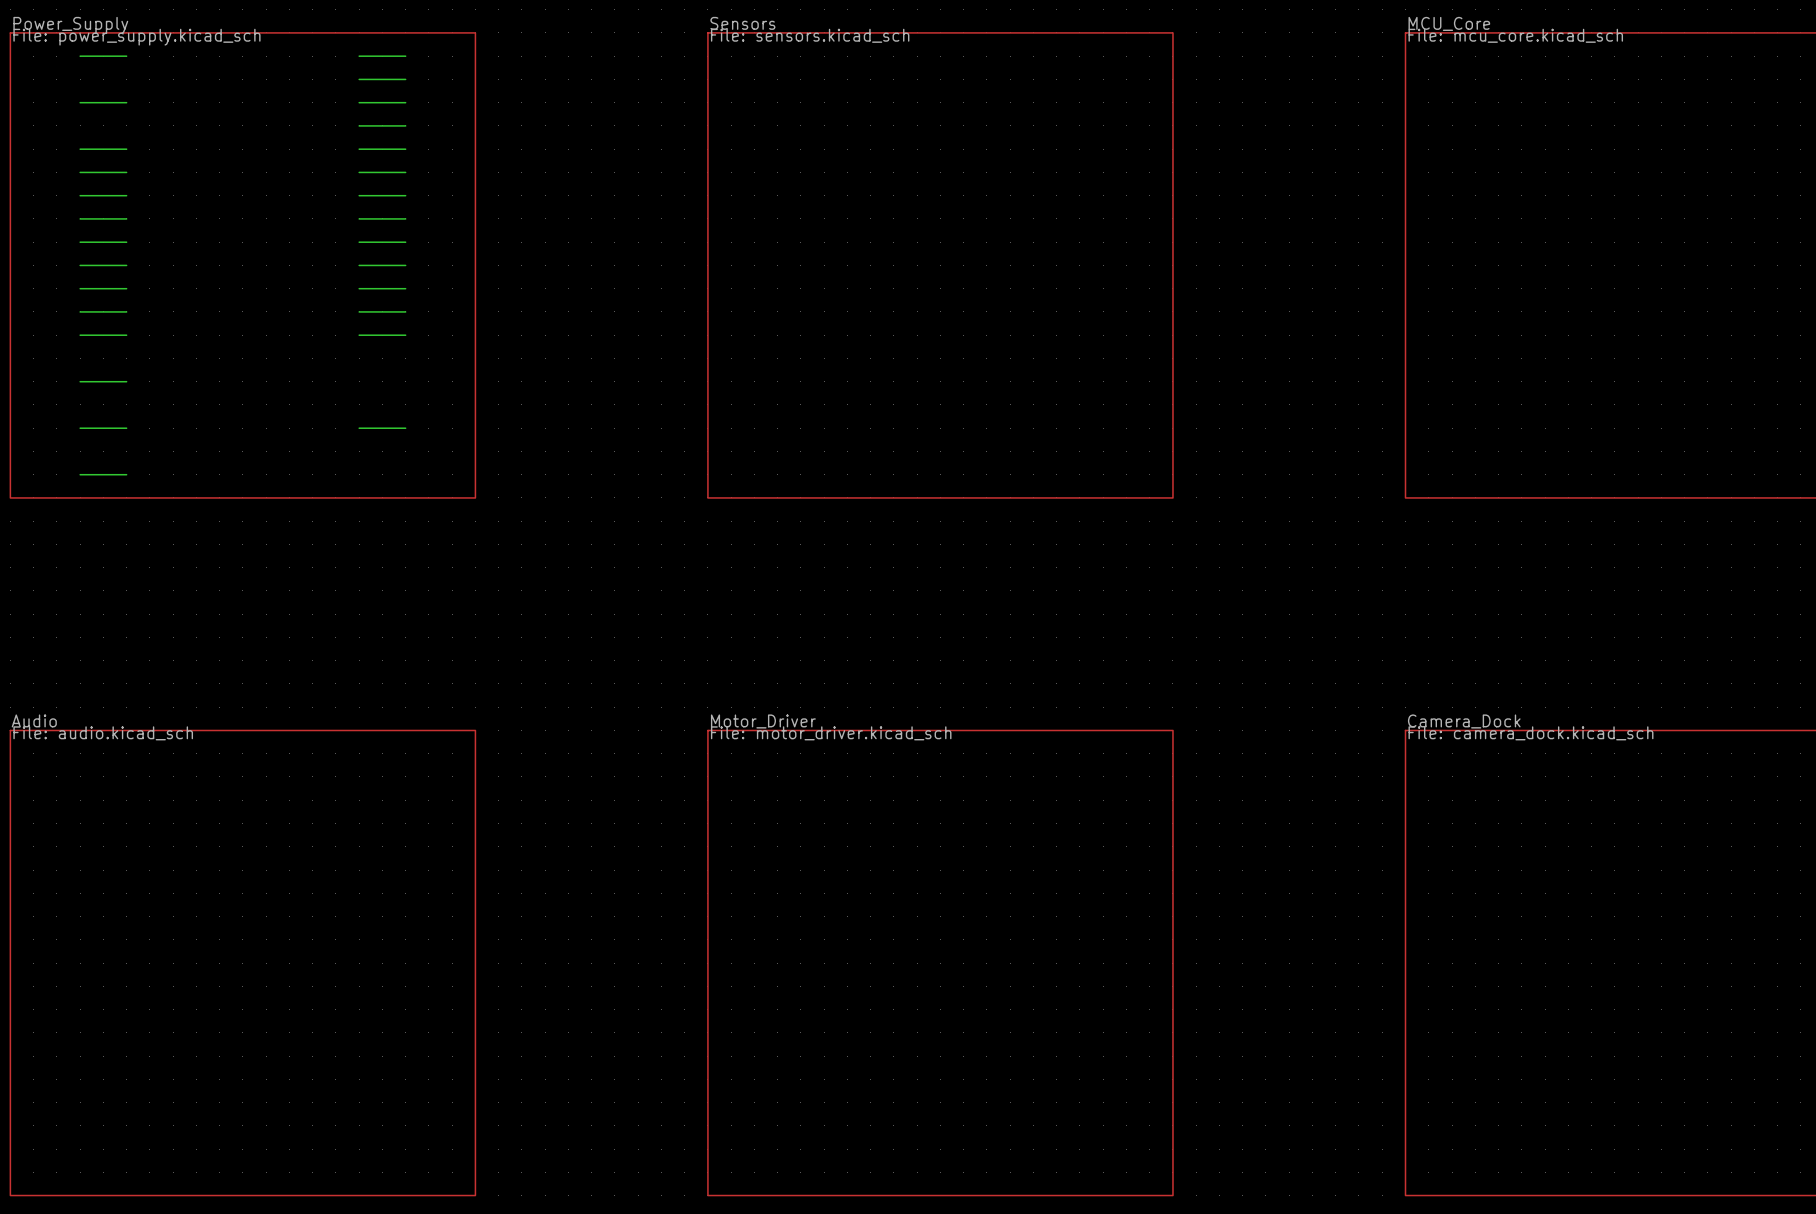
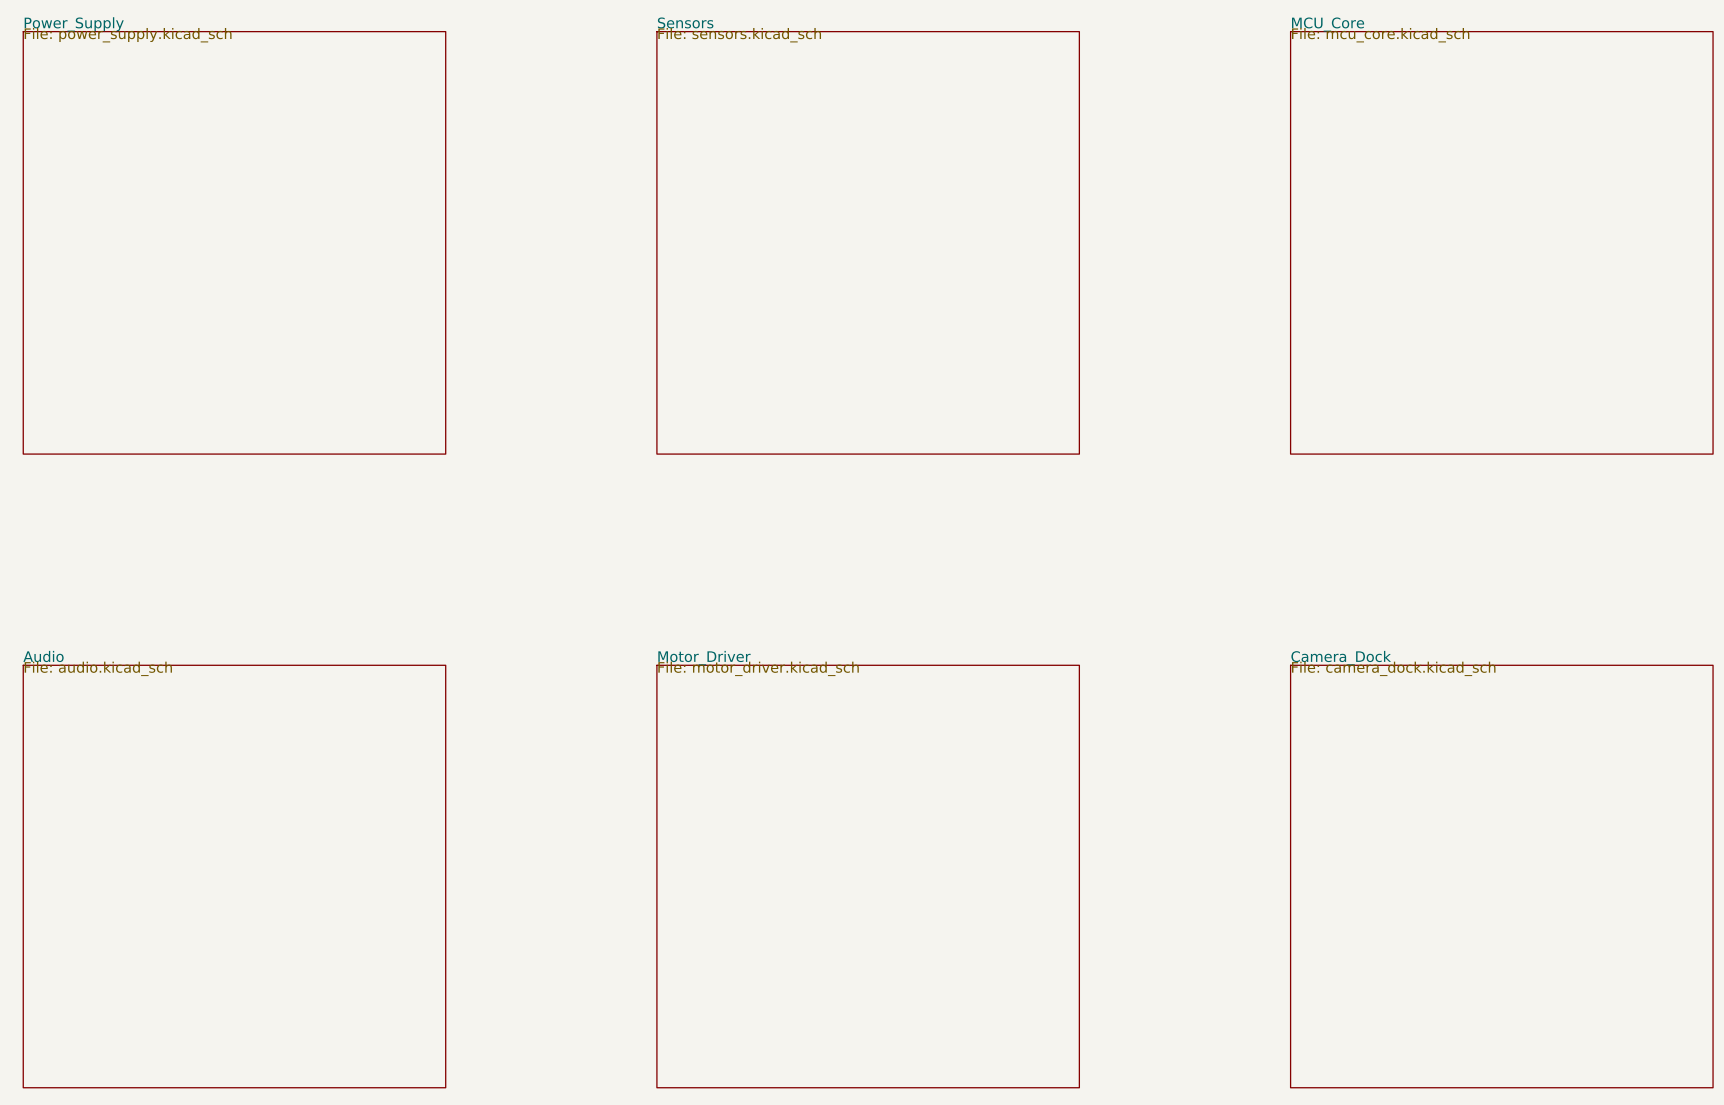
wire: (80, 56) (126, 56) -> none
wire: (359, 56) (405, 56) -> none
wire: (359, 79) (405, 79) -> none
wire: (80, 102) (126, 102) -> none
wire: (359, 102) (405, 102) -> none
wire: (359, 125) (405, 125) -> none
wire: (80, 149) (126, 149) -> none
wire: (359, 149) (405, 149) -> none
wire: (80, 172) (126, 172) -> none
wire: (359, 172) (405, 172) -> none
wire: (80, 195) (126, 195) -> none
wire: (359, 195) (405, 195) -> none
wire: (80, 218) (126, 218) -> none
wire: (359, 218) (405, 218) -> none
wire: (80, 242) (126, 242) -> none
wire: (359, 242) (405, 242) -> none
wire: (80, 265) (126, 265) -> none
wire: (359, 265) (405, 265) -> none
wire: (80, 288) (126, 288) -> none
wire: (359, 288) (405, 288) -> none
wire: (80, 311) (126, 311) -> none
wire: (359, 311) (405, 311) -> none
wire: (80, 335) (126, 335) -> none
wire: (359, 335) (405, 335) -> none
wire: (80, 381) (126, 381) -> none
wire: (80, 428) (126, 428) -> none
wire: (359, 428) (405, 428) -> none
wire: (80, 474) (126, 474) -> none

